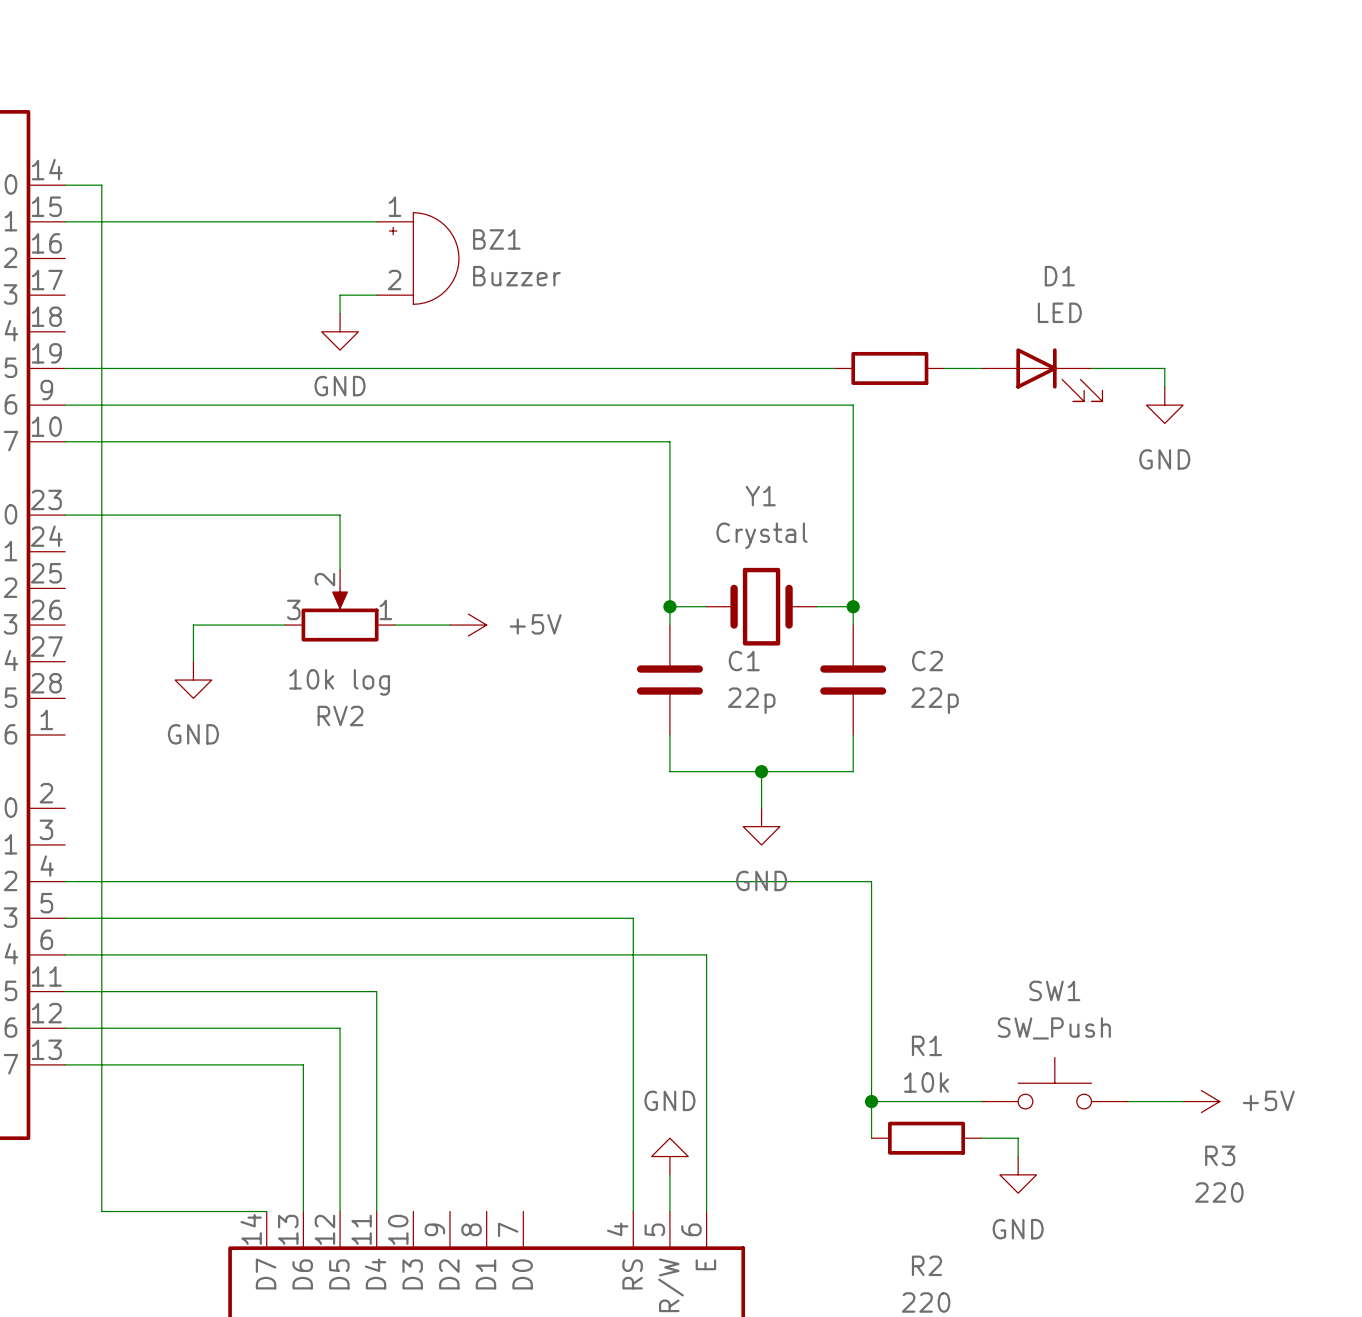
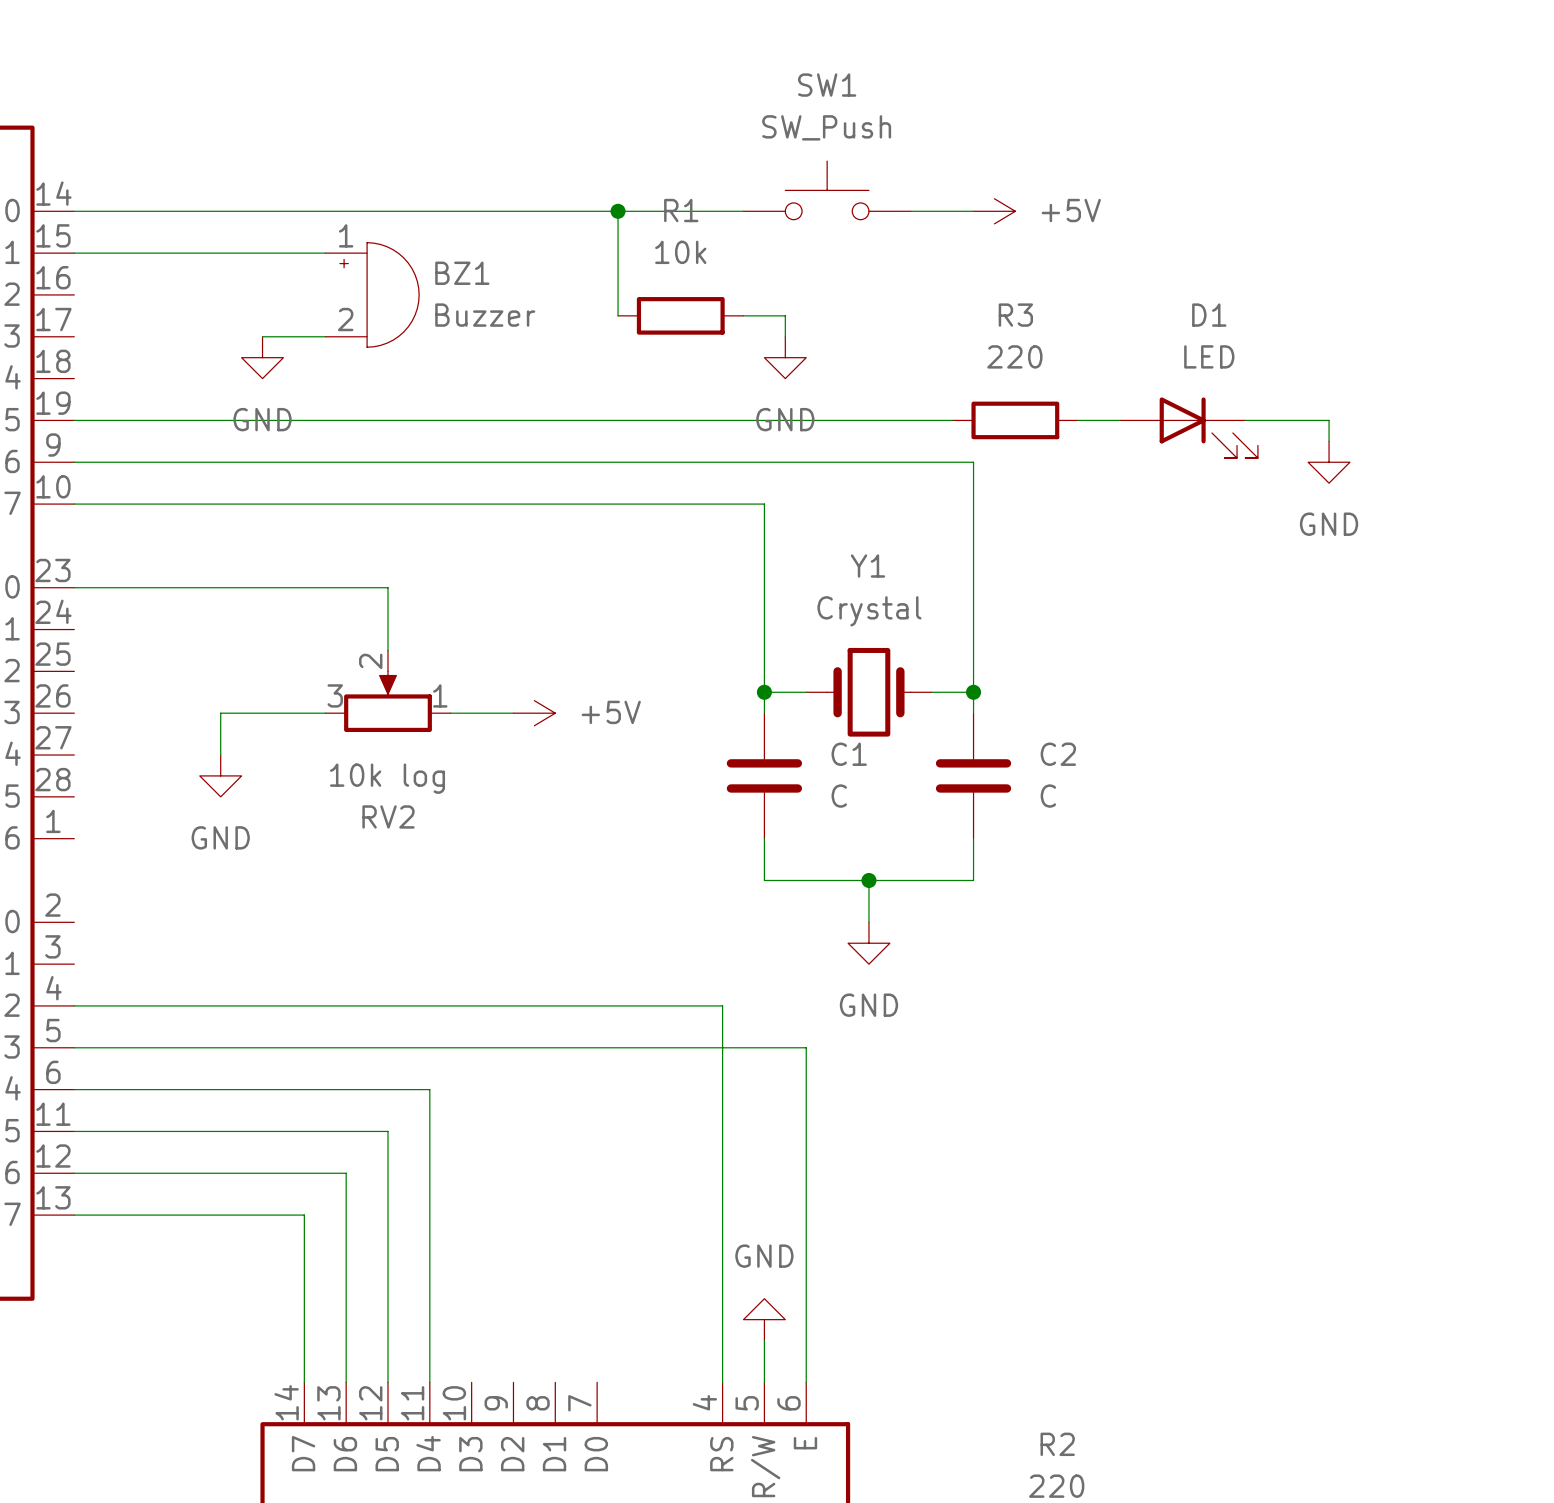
wire: (101, 185) (101, 1211) (266, 1211) -> (116, 211) (743, 211)
wire: none -> (618, 211) (618, 315)
junction: none -> (618, 211)
wire: none -> (910, 211) (973, 211)
power symbol: none -> +5V (994, 211)
wire: (285, 221) (376, 221) -> none
BZ1 position: (417, 258) -> (372, 294)
wire: none -> (743, 315) (785, 315) (785, 336)
wire: none -> (262, 336) (325, 336)
wire: (376, 295) (340, 295) (340, 313) -> none
power symbol: none -> GND (785, 357)
power symbol position: GND (340, 331) -> GND (262, 357)
C1 value: 22p (751, 700) -> C (839, 796)
C2 value: 22p (934, 700) -> C (1048, 796)
wire: (633, 881) (871, 881) (871, 1138) -> (722, 1005) (722, 1047) (806, 1047) (806, 1089)
wire: (376, 954) (706, 954) -> none
wire: (340, 991) (376, 991) -> (429, 1089) (429, 1131)
wire: none -> (388, 1131) (388, 1173)
wire: (303, 1028) (340, 1028) -> (346, 1173) (346, 1215)
wire: (266, 1064) (303, 1064) -> (304, 1215) (304, 1382)
SW1 position: (1054, 1083) -> (827, 190)
wire: (871, 1101) (981, 1101) -> none
junction: (871, 1101) -> none
wire: (1128, 1101) (1183, 1101) -> none
power symbol: +5V (1201, 1101) -> none
R1 position: (926, 1138) -> (680, 315)
wire: (981, 1138) (1018, 1138) (1018, 1156) -> none
R3 name position: R3 (1220, 1155) -> R3 (1015, 315)
power symbol: GND (1018, 1174) -> none
R3 value position: 220 (1219, 1192) -> 220 (1014, 356)

